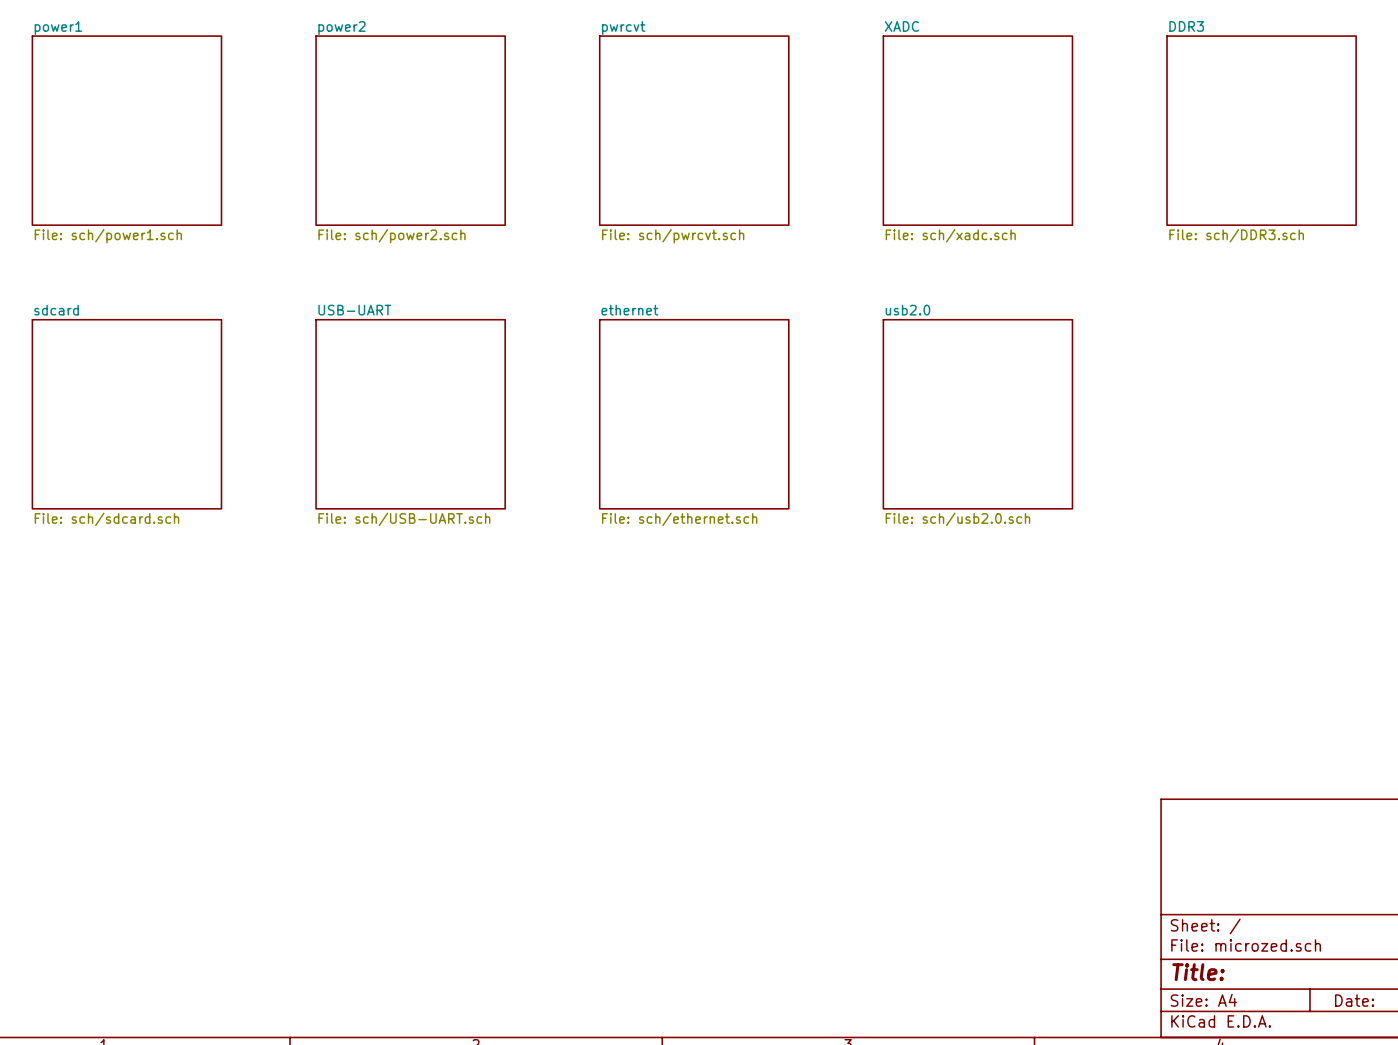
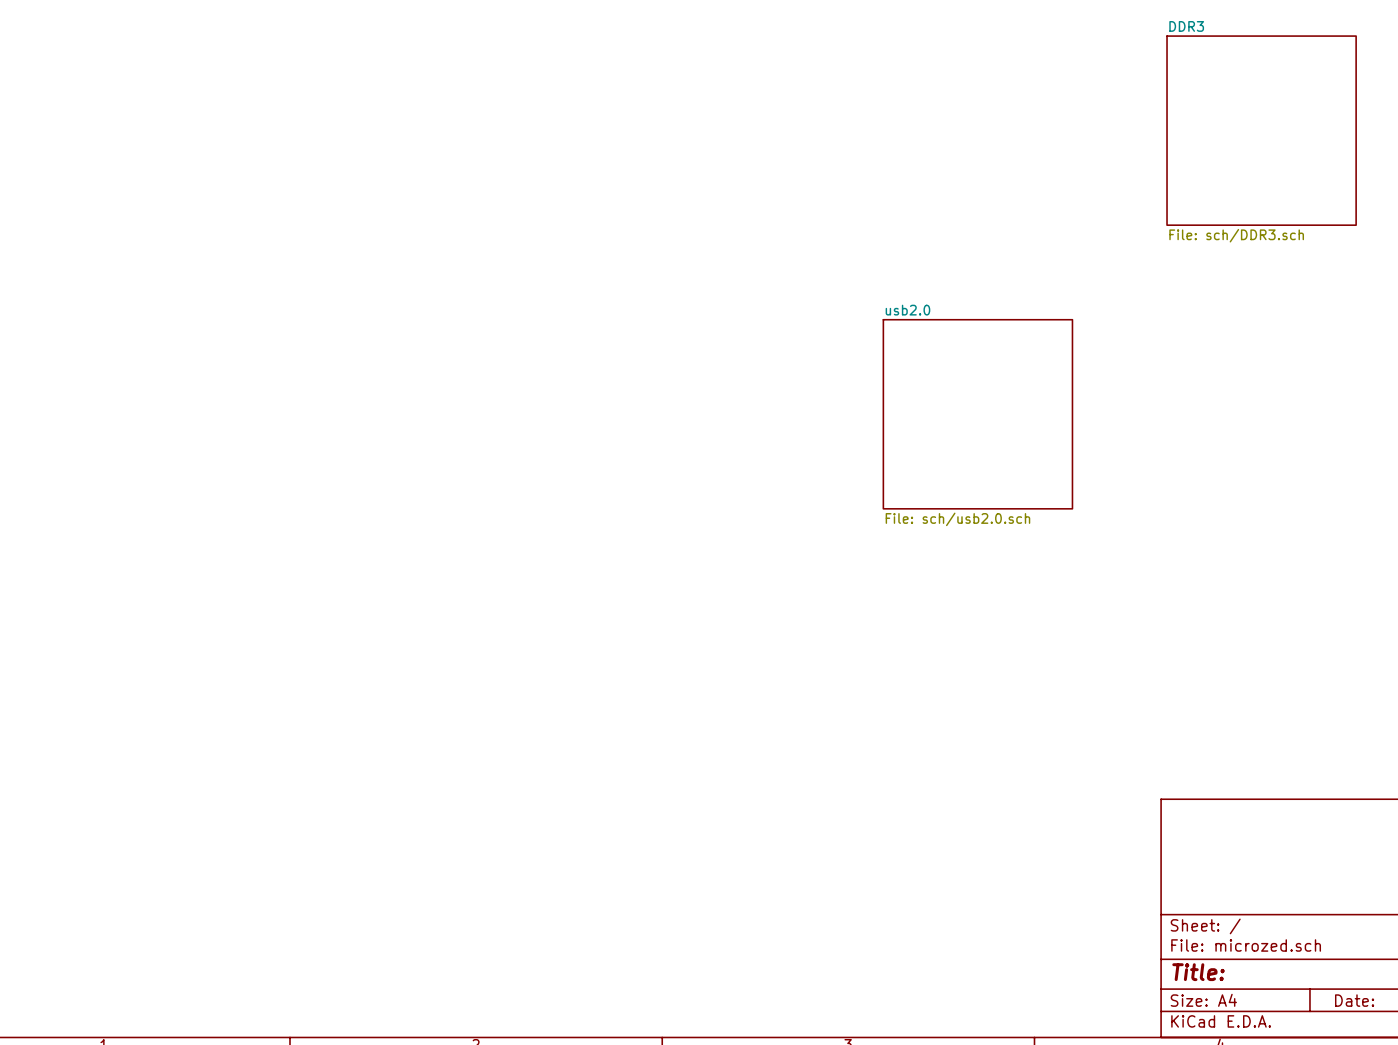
sheet power1: File: sch/power1.sch (126, 130) -> none
sheet power2: File: sch/power2.sch (410, 130) -> none
sheet pwrcvt: File: sch/pwrcvt.sch (694, 130) -> none
sheet XADC: File: sch/xadc.sch (977, 130) -> none
sheet sdcard: File: sch/sdcard.sch (126, 414) -> none
sheet USB-UART: File: sch/USB-UART.sch (410, 414) -> none
sheet ethernet: File: sch/ethernet.sch (694, 414) -> none

